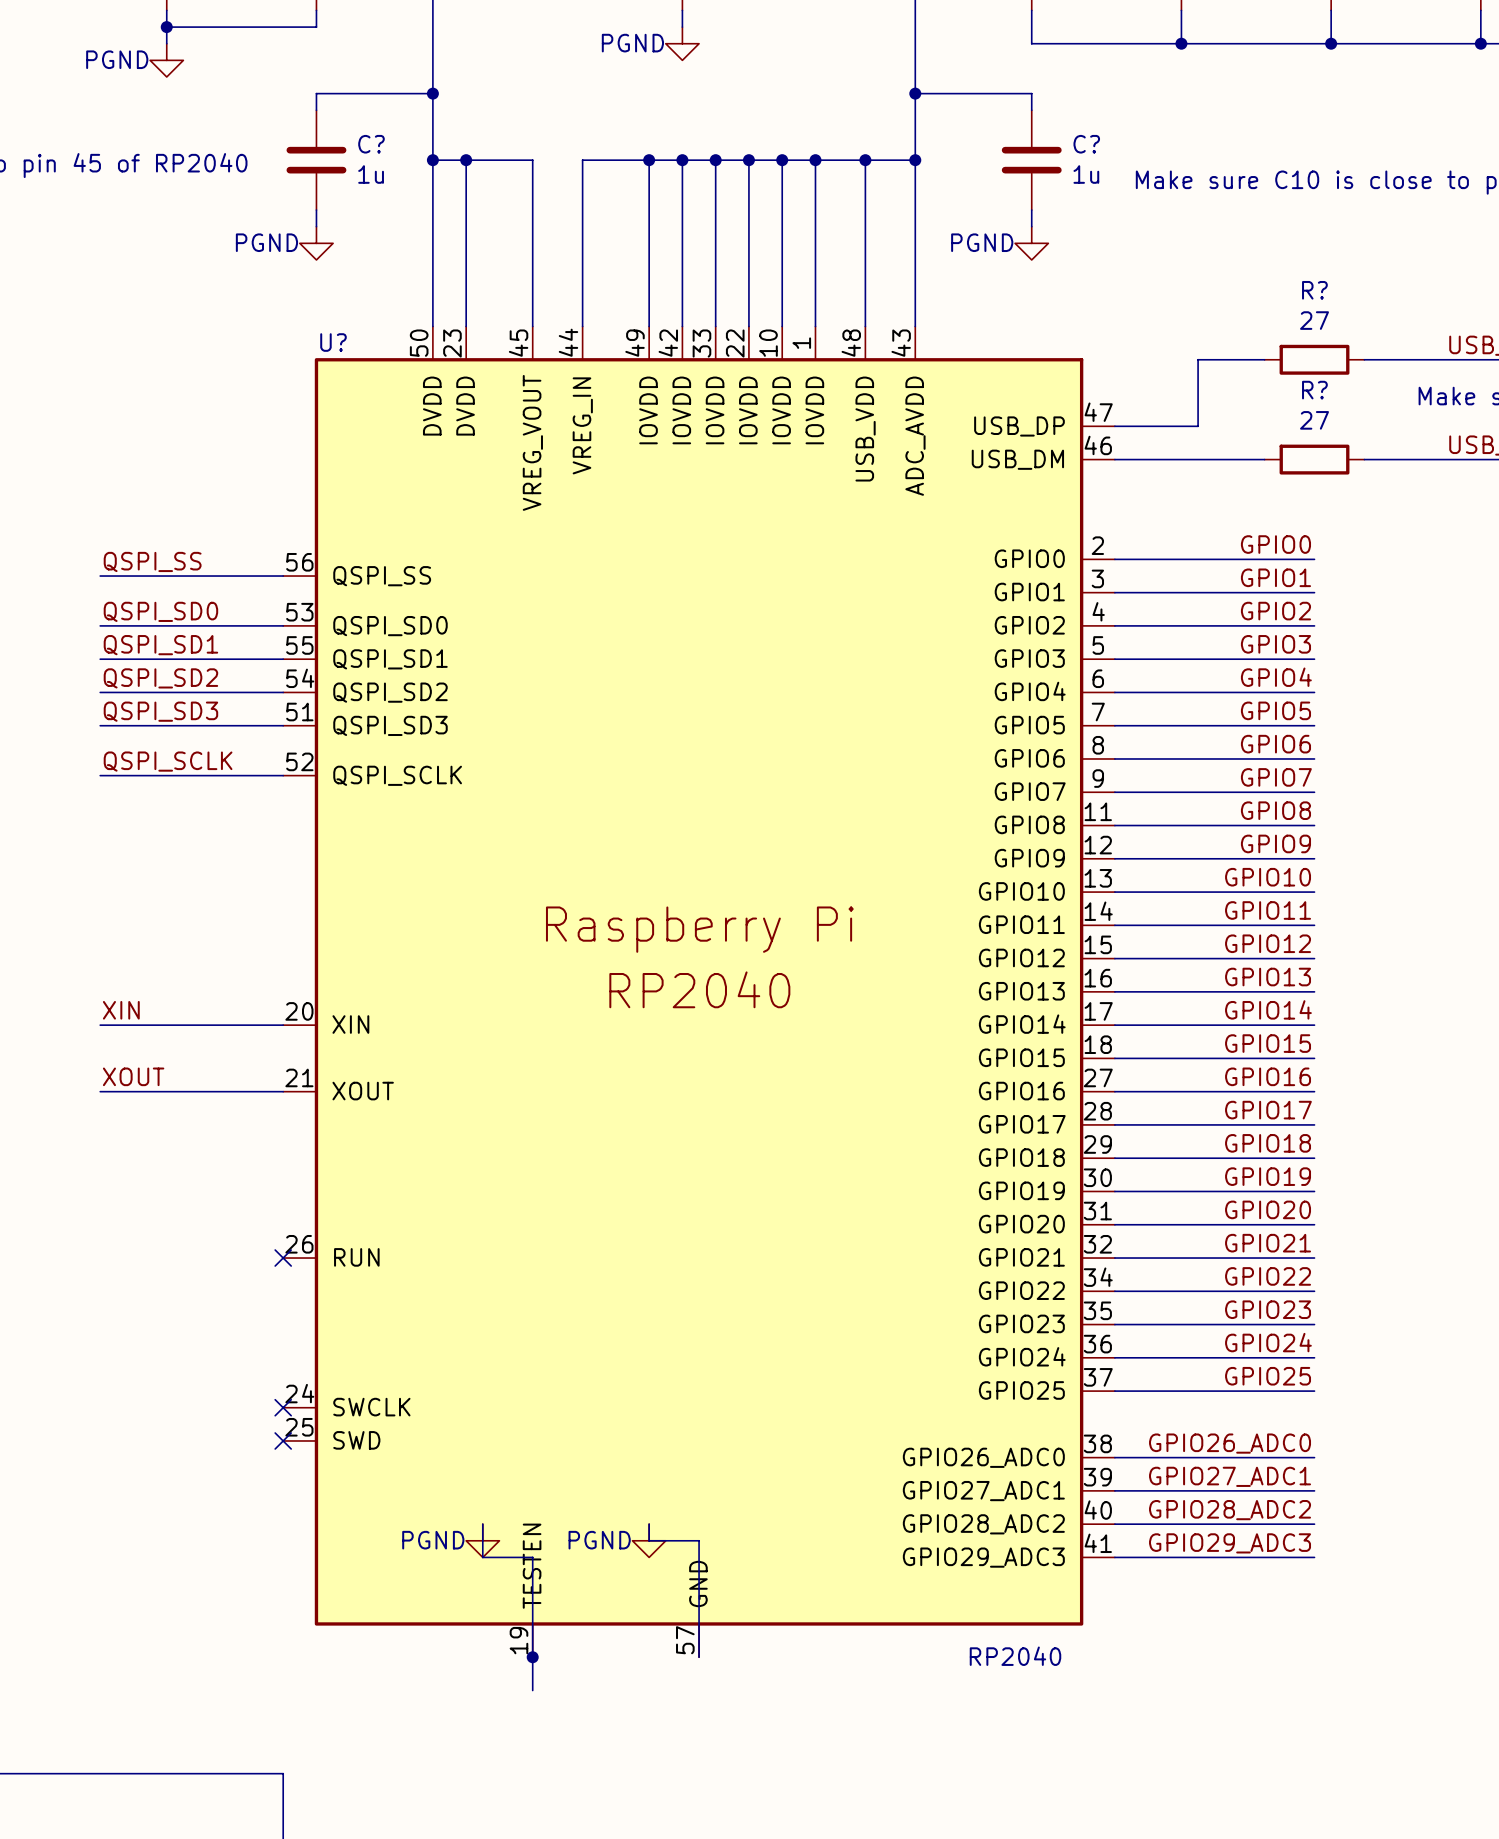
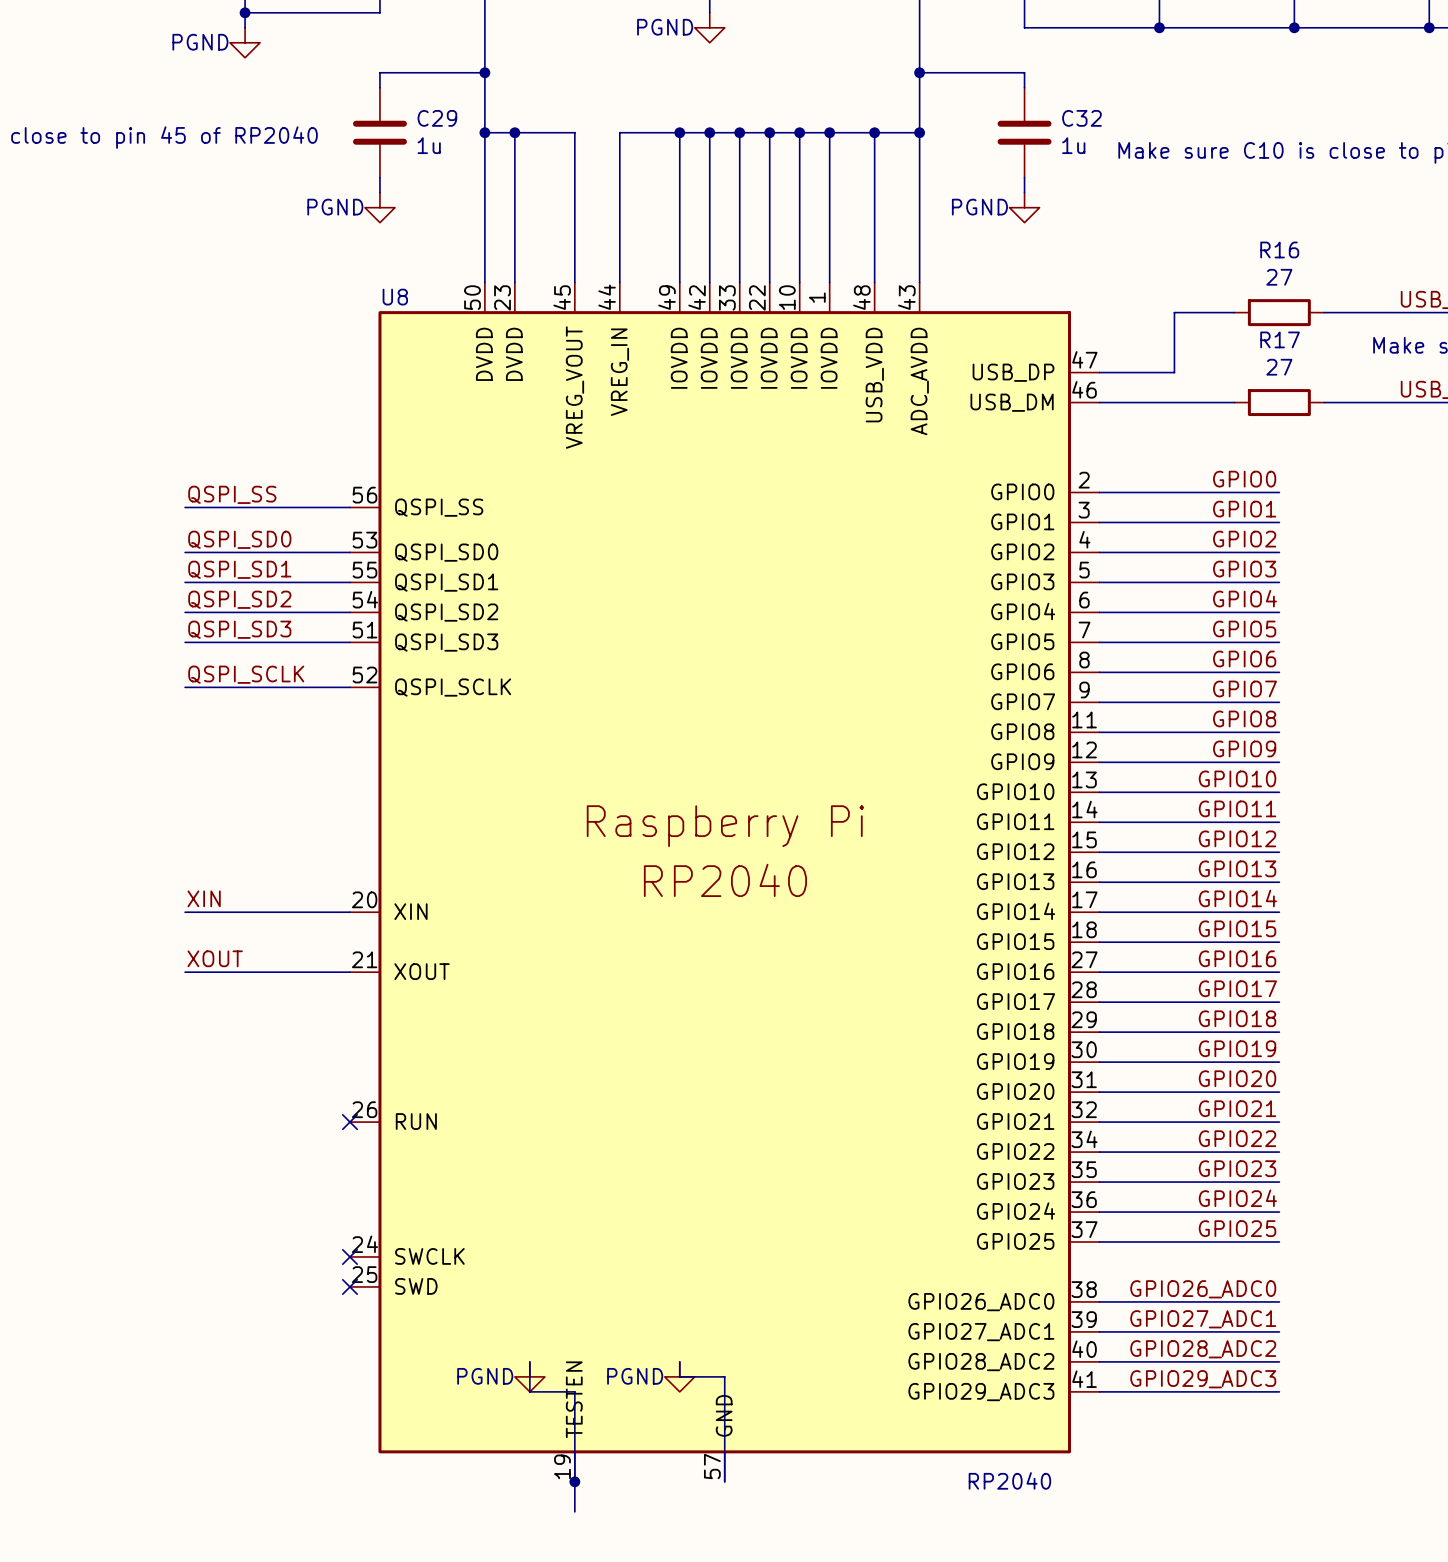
C? name: C? (371, 144) -> C29 (437, 118)
C? name: C? (1086, 144) -> C32 (1081, 118)
R? name: R? (1314, 290) -> R16 (1279, 249)
U? name: U? (333, 342) -> U8 (395, 297)
R? name: R? (1314, 390) -> R17 (1280, 339)

